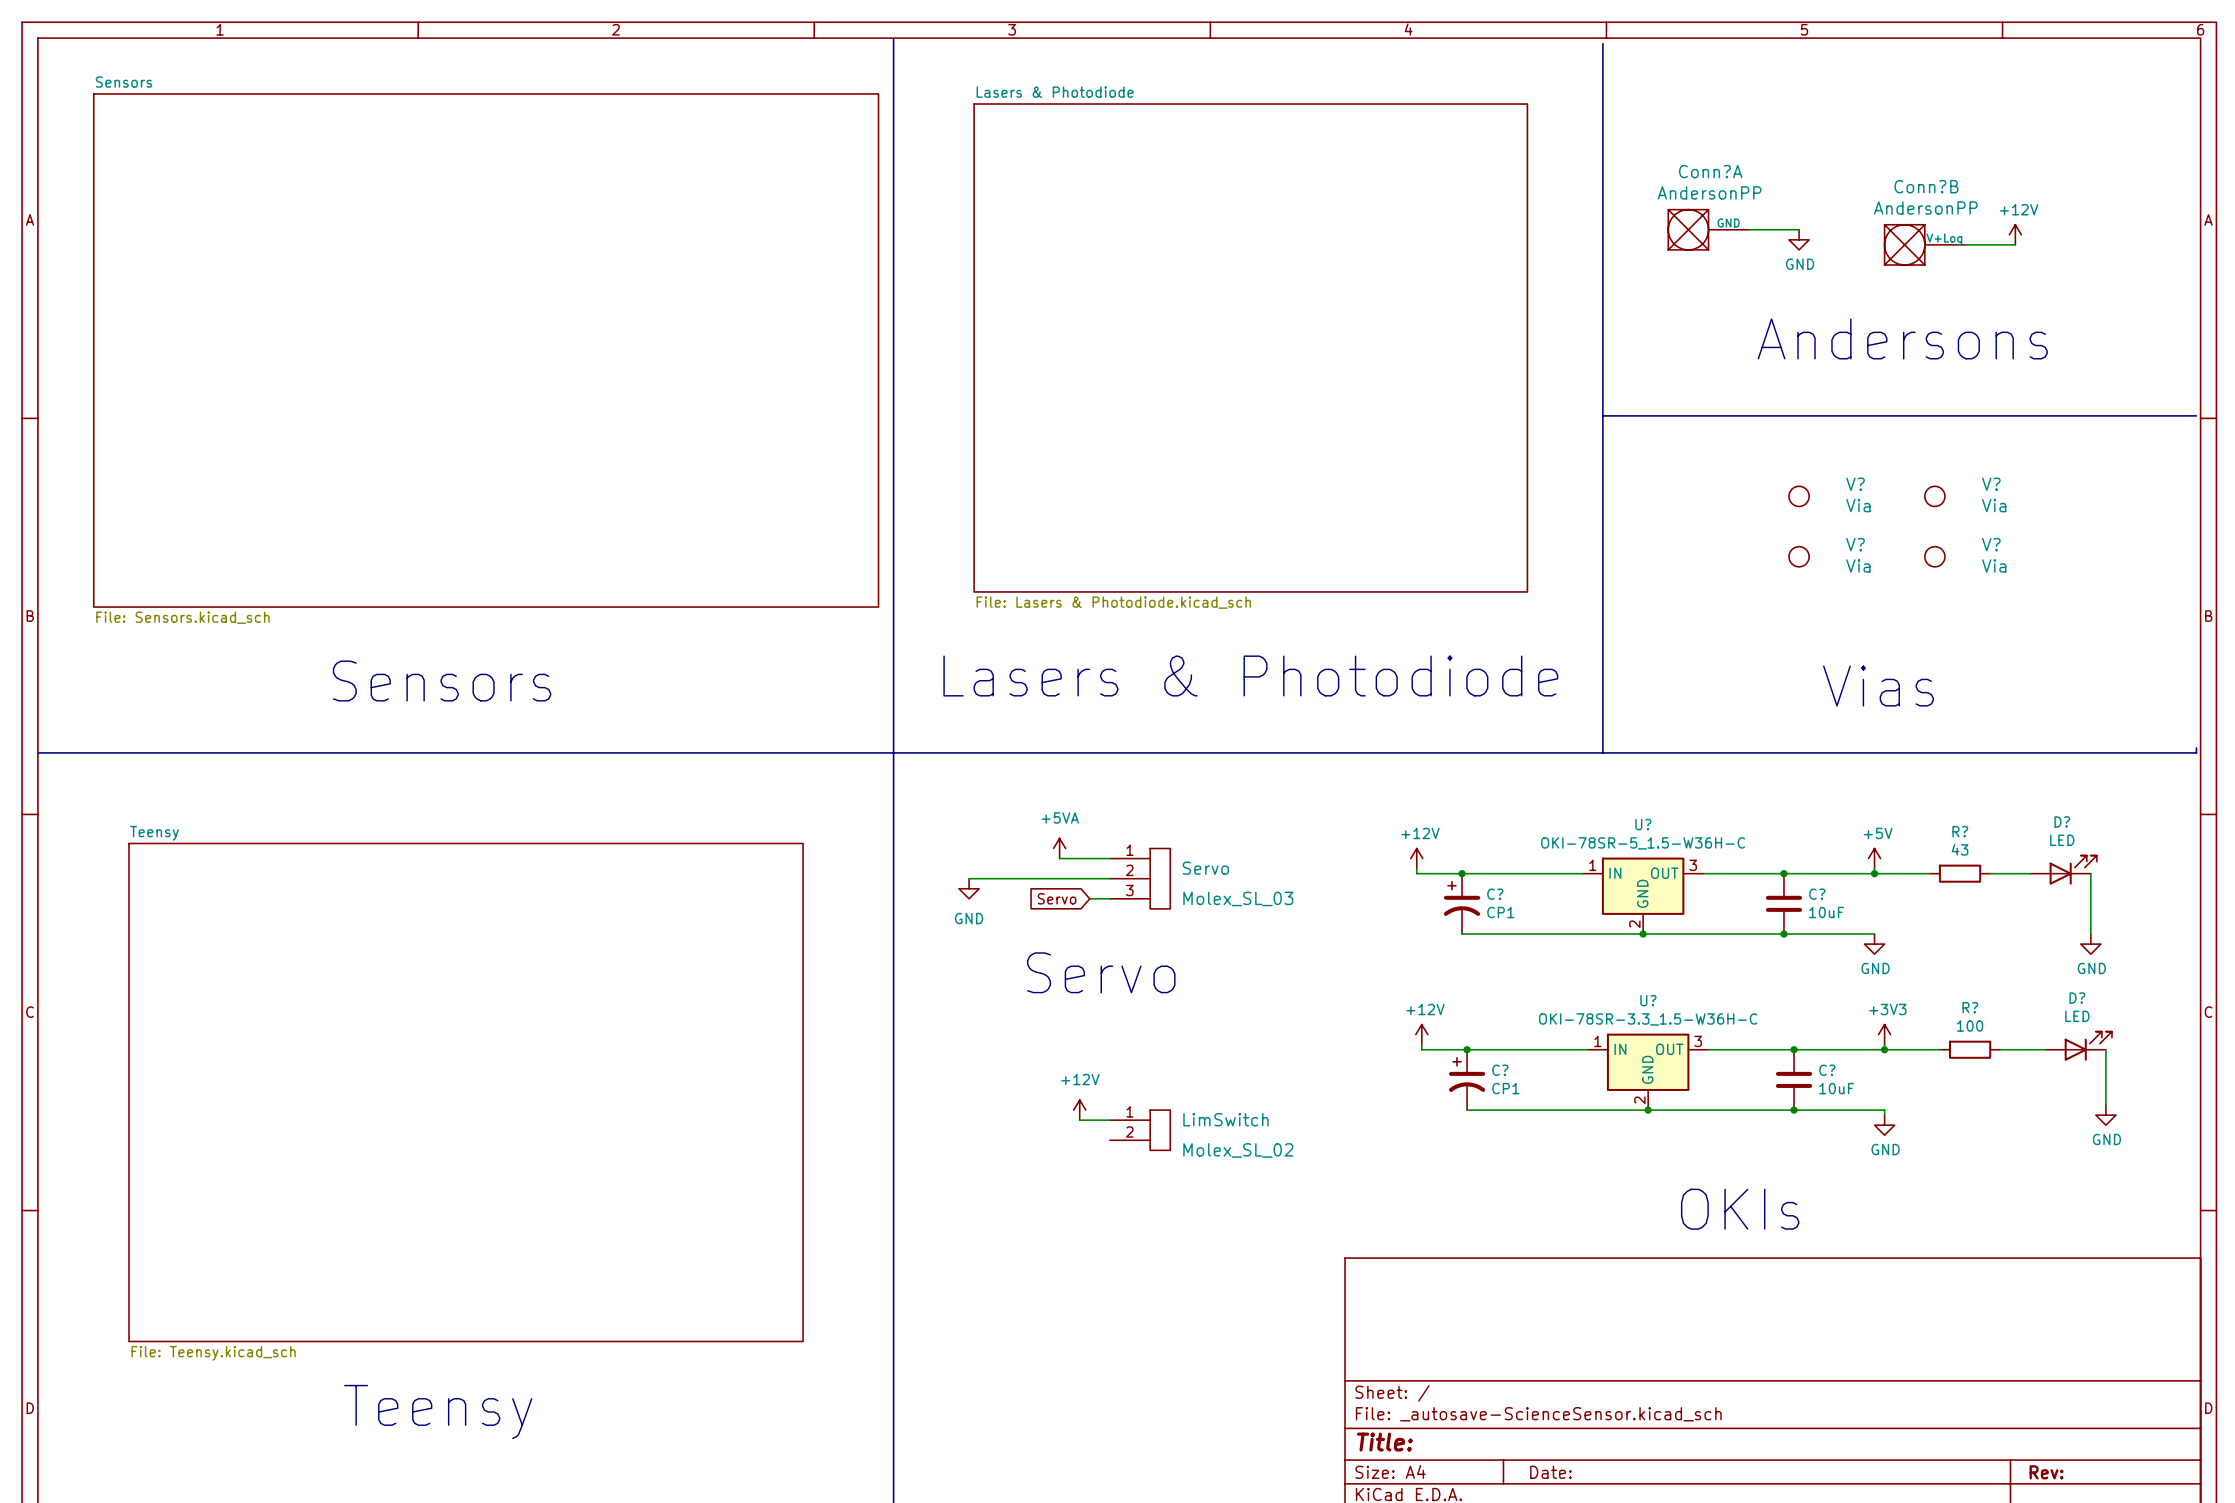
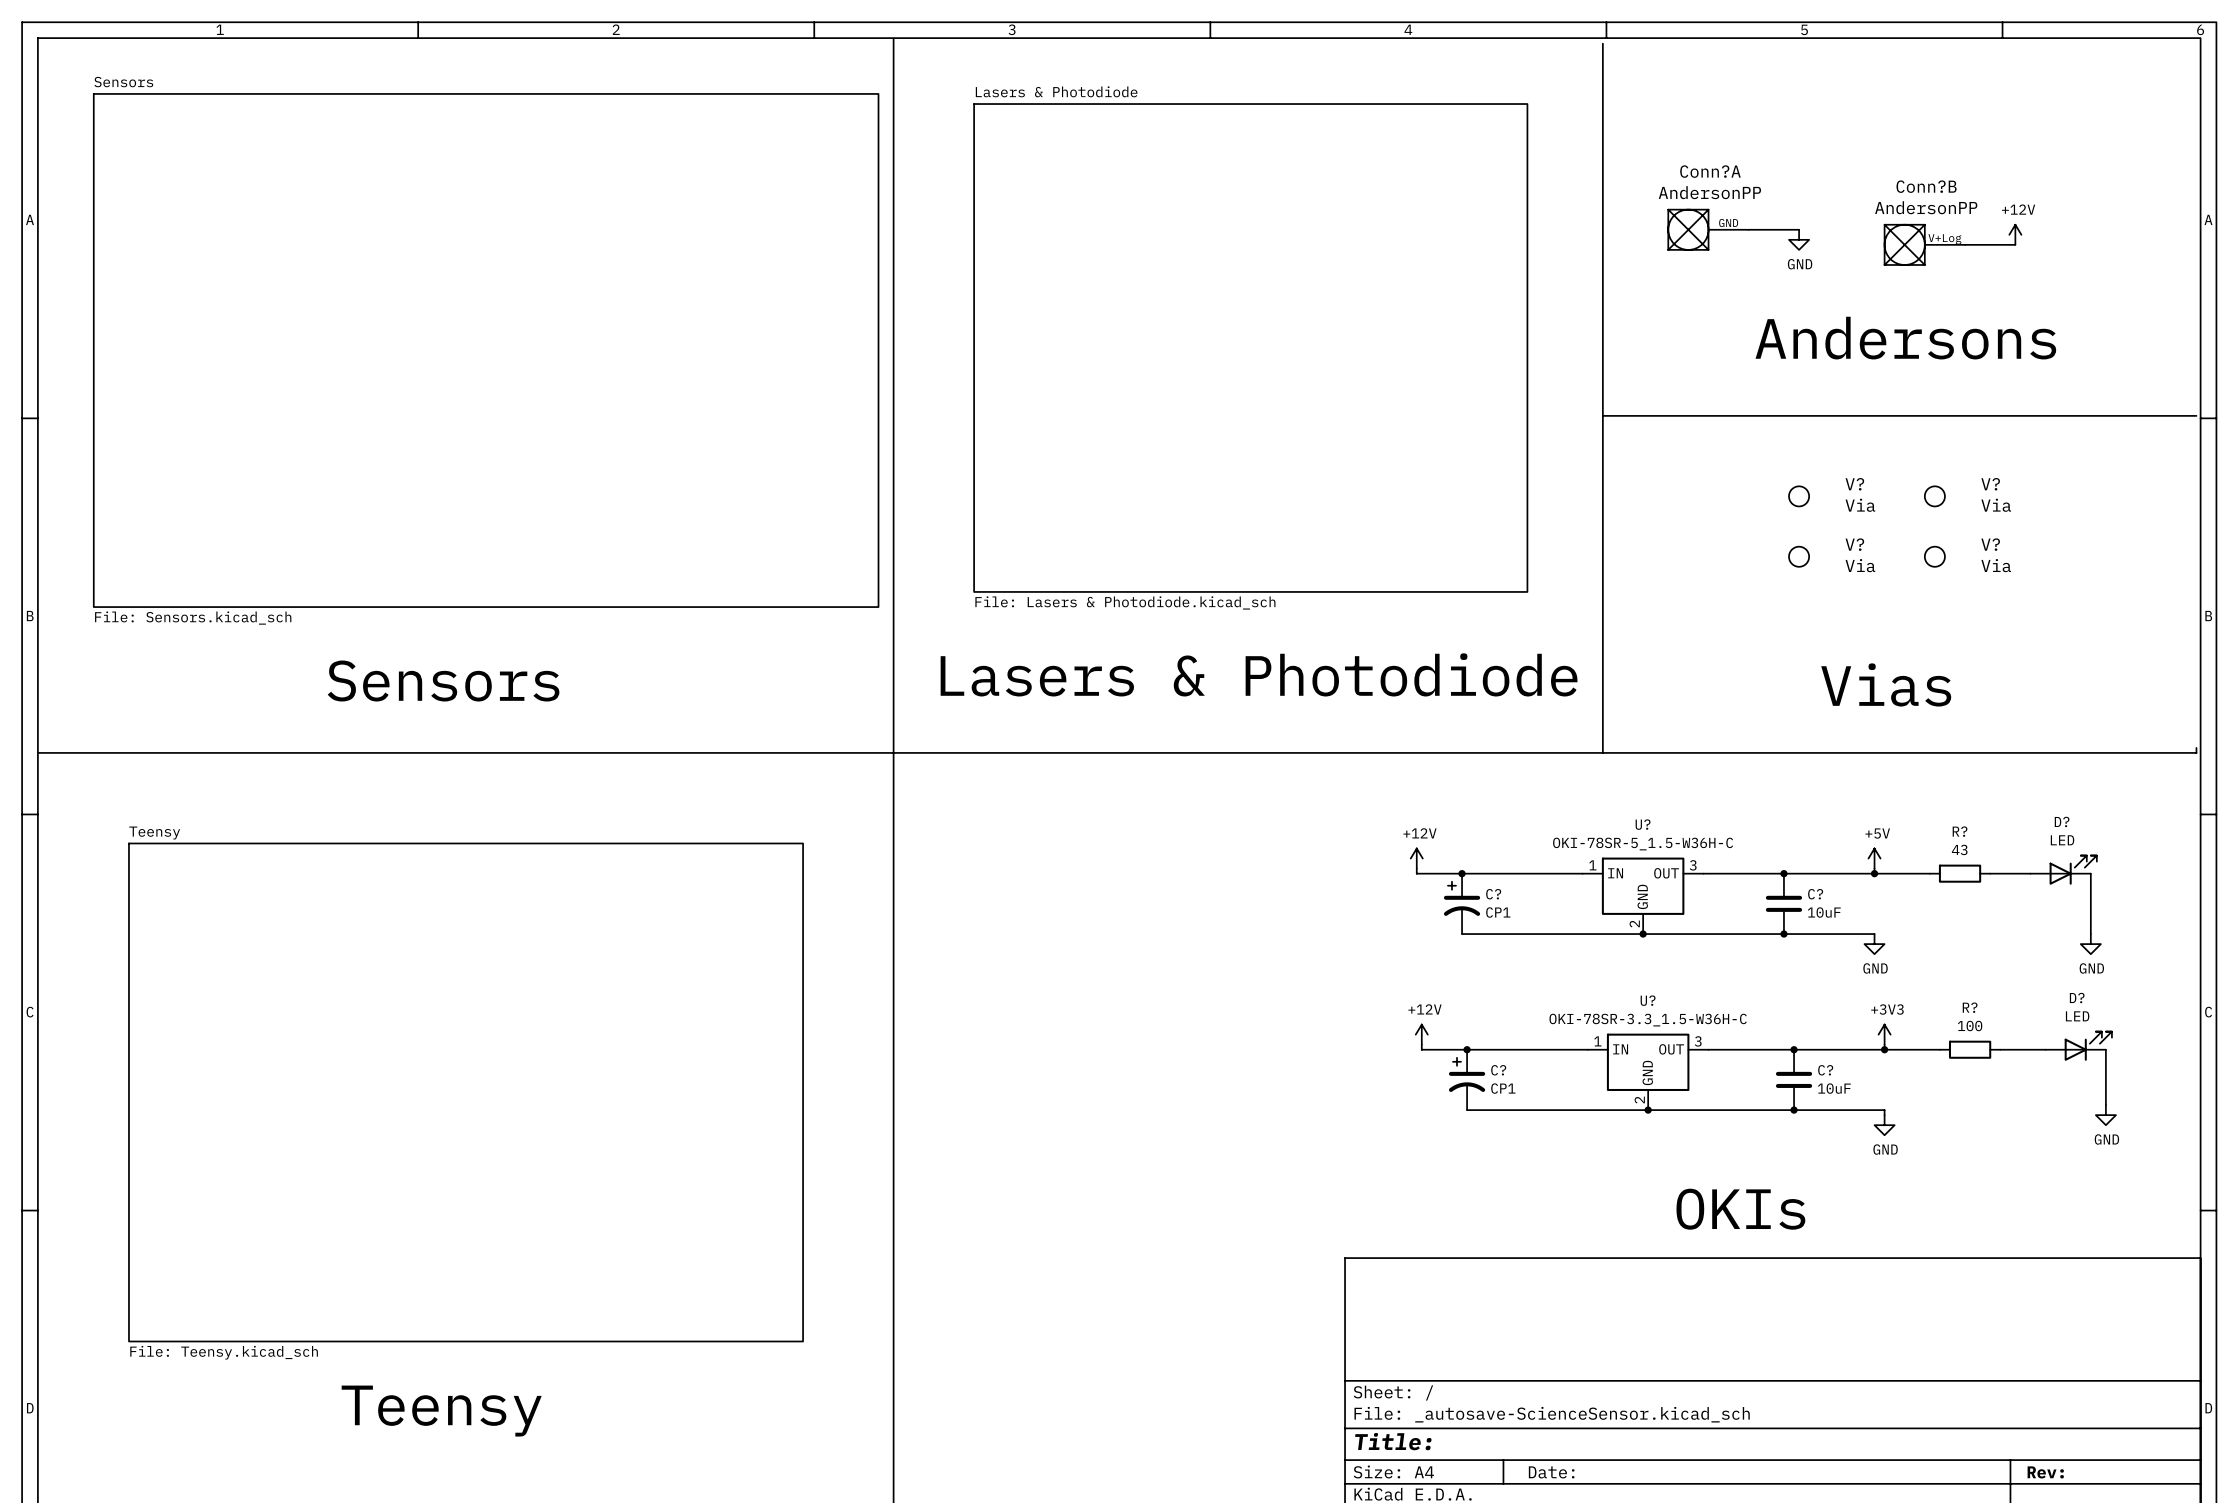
power symbol: +5VA (1059, 848) -> none
wire: (1059, 858) (1109, 858) -> none
wire: (969, 878) (1109, 878) -> none
Servo: Molex_SL_03 (1140, 878) -> none
power symbol: GND (969, 888) -> none
global label: Servo (1057, 898) -> none
wire: (1089, 898) (1109, 898) -> none
text: Servo (1101, 972) -> none
power symbol: +12V (1079, 1110) -> none
wire: (1079, 1120) (1109, 1120) -> none
LimSwitch: Molex_SL_02 (1140, 1130) -> none

